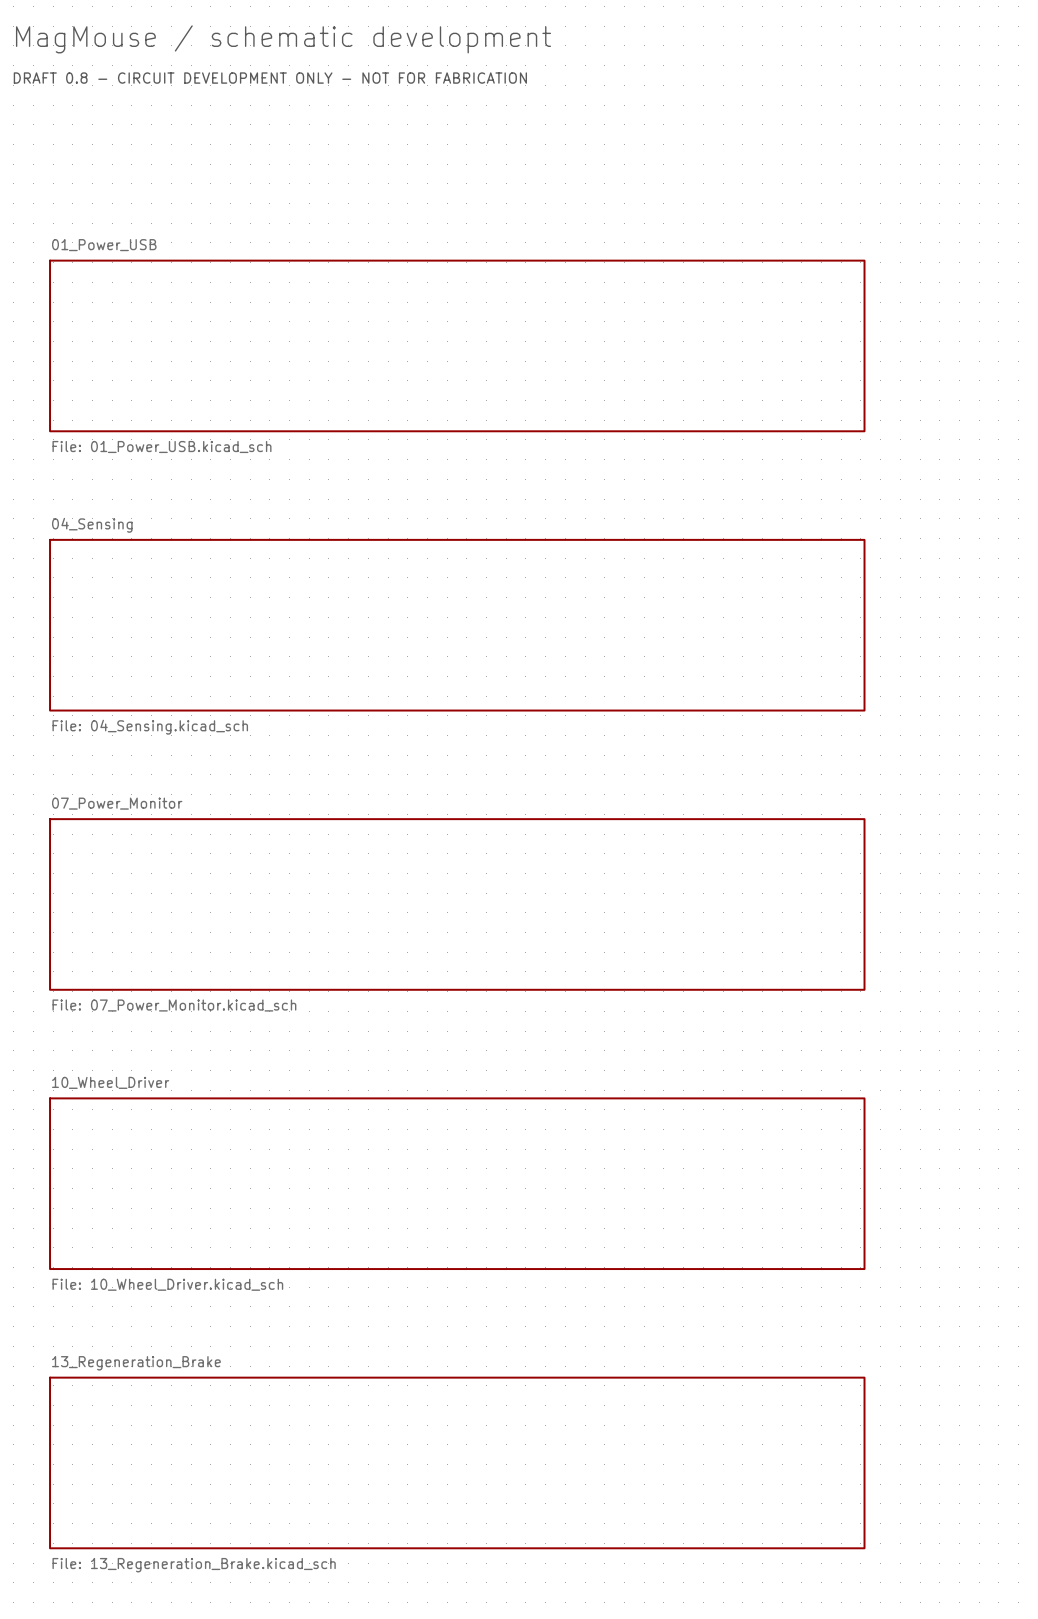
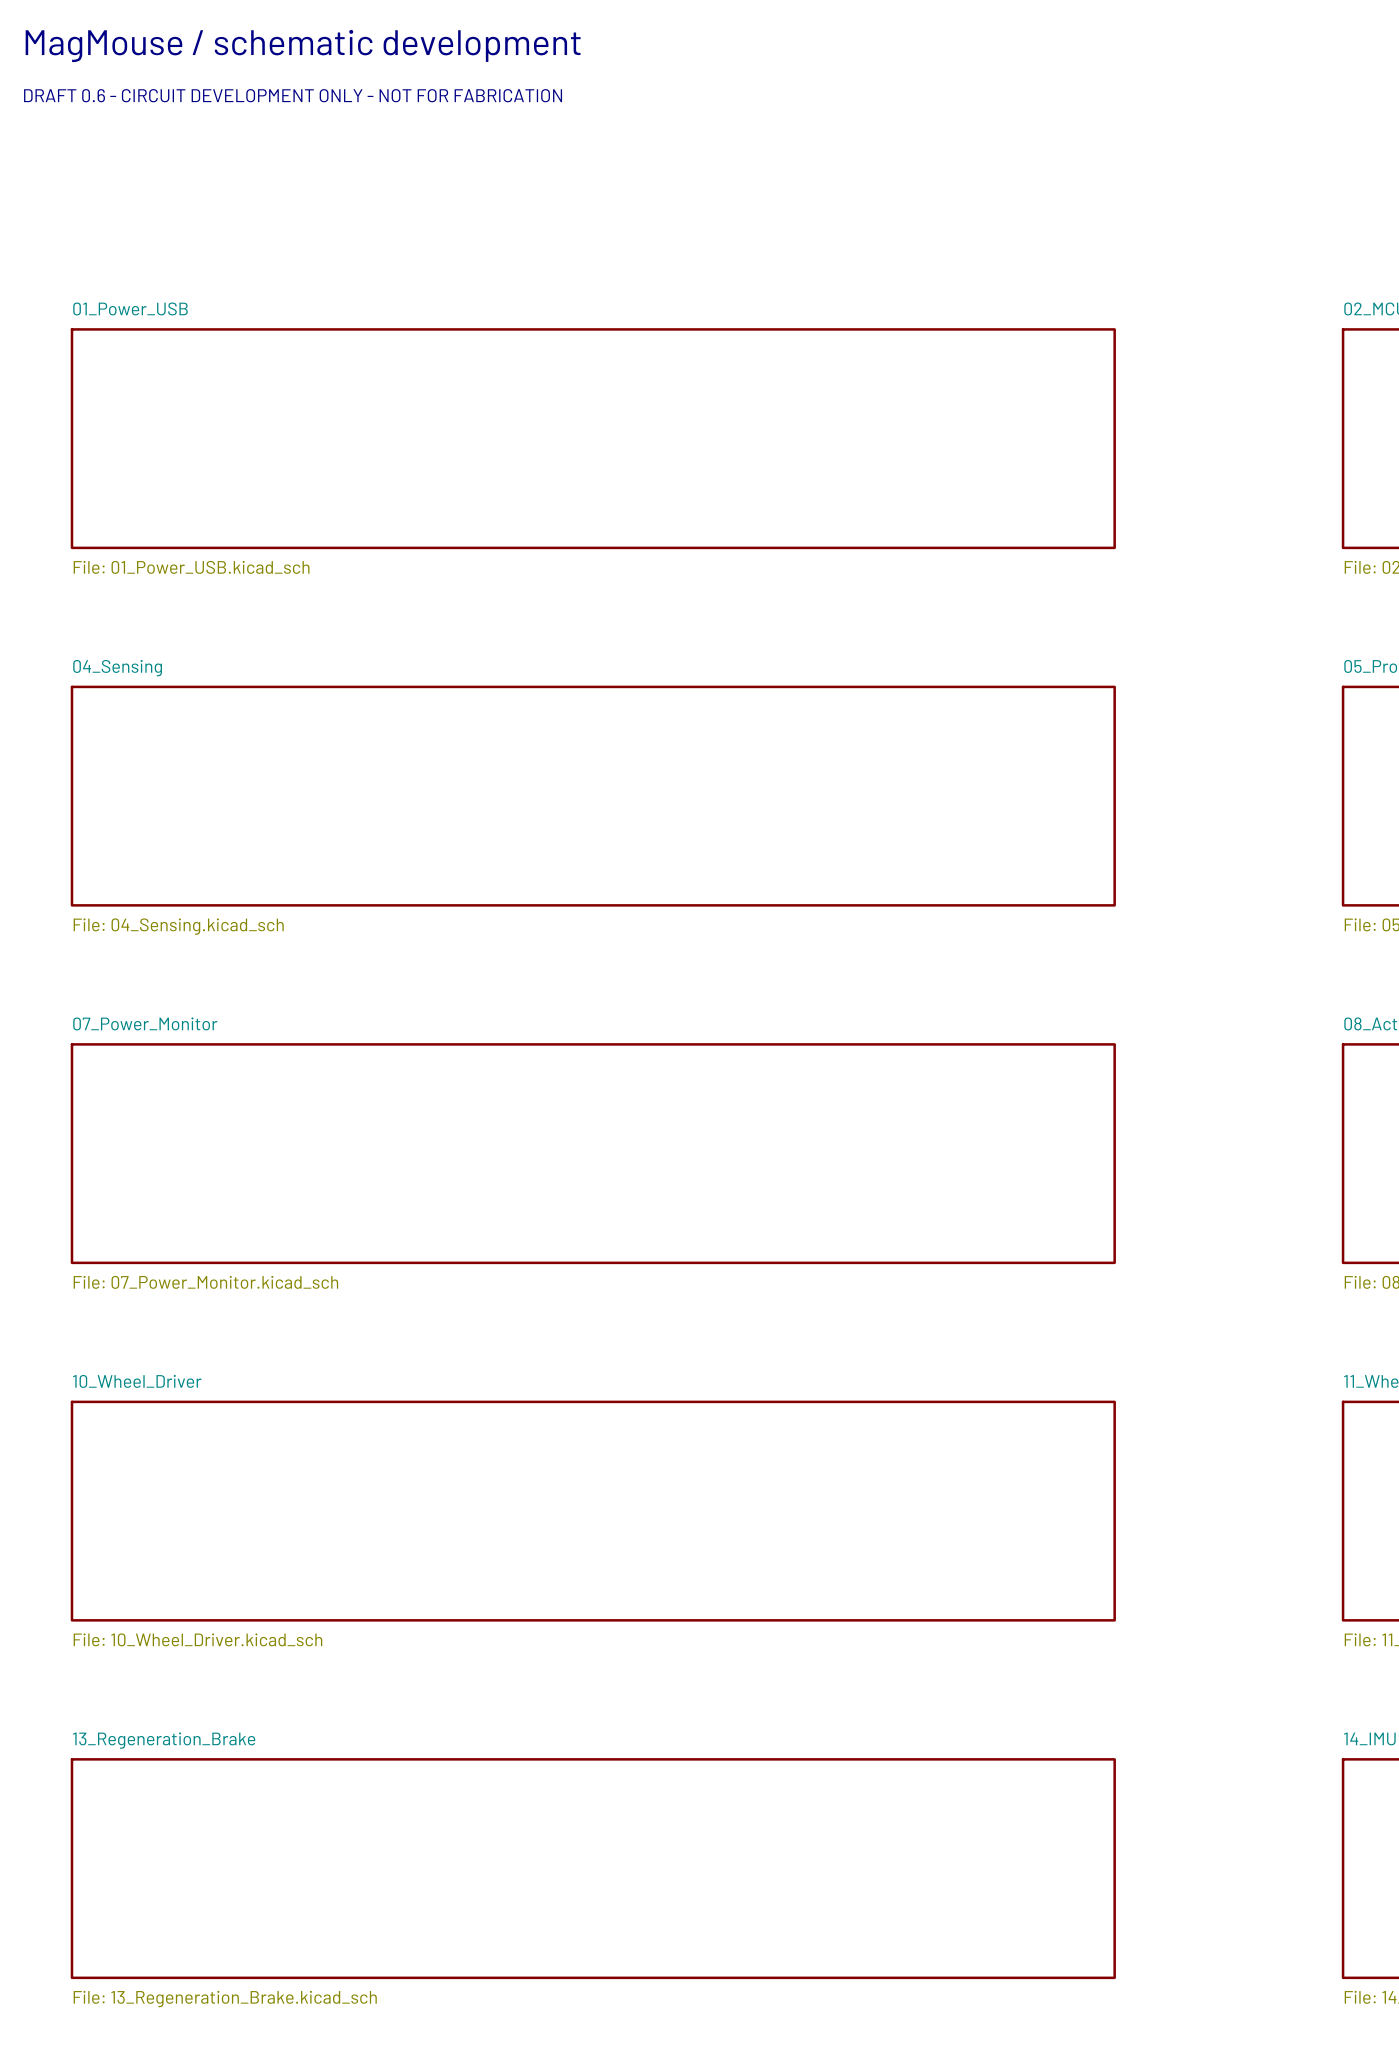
text: DRAFT 0.8 - CIRCUIT DEVELOPMENT ONLY - NOT FOR FABRICATION (270, 78) -> DRAFT 0.6 - CIRCUIT DEVELOPMENT ONLY - NOT FOR FABRICATION (293, 95)

